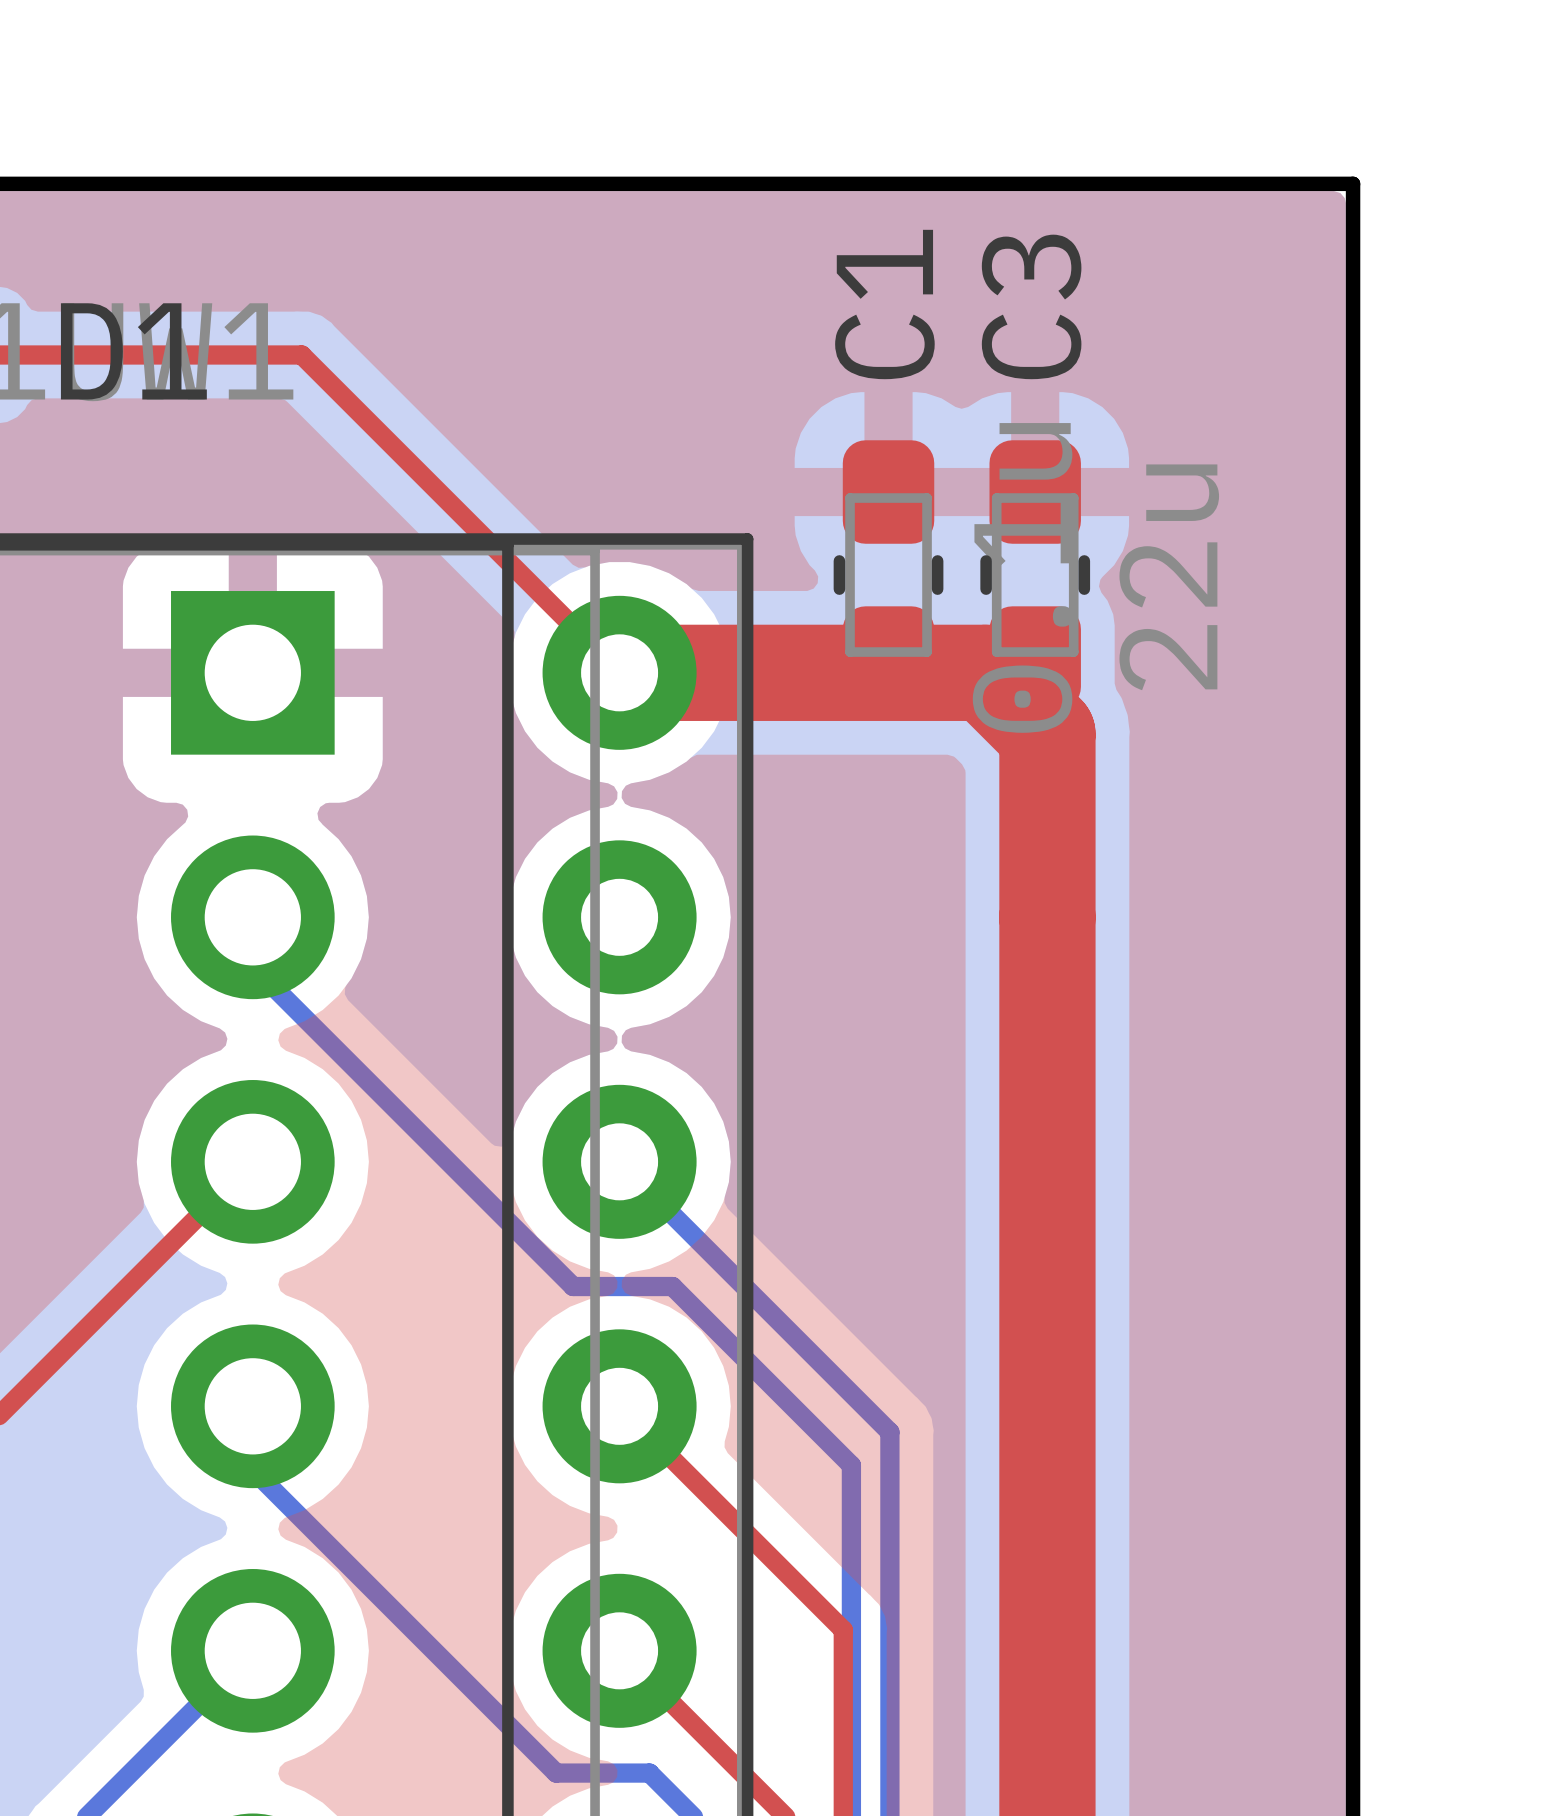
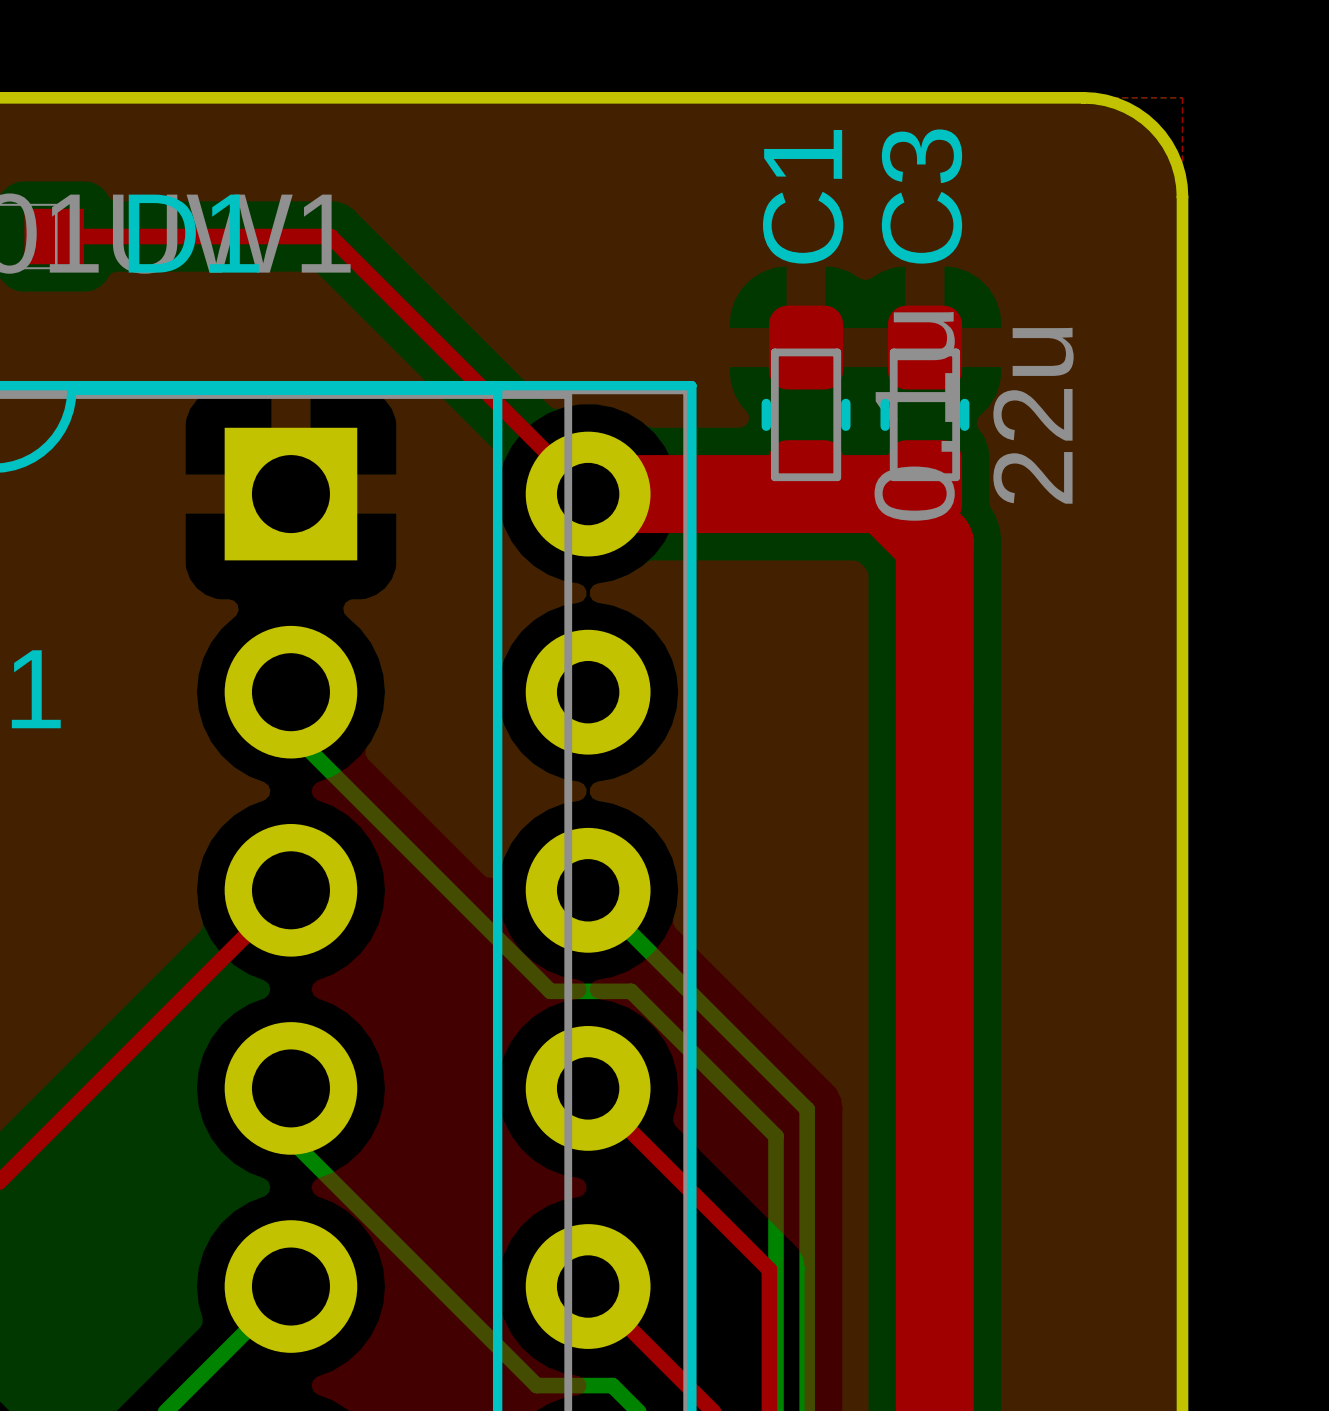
board edge: (1230, 183) (1353, 183) (1353, 306) -> (1083, 97) (1105, 100) (1126, 107) (1153, 126) (1172, 153) (1179, 174) (1182, 196)

